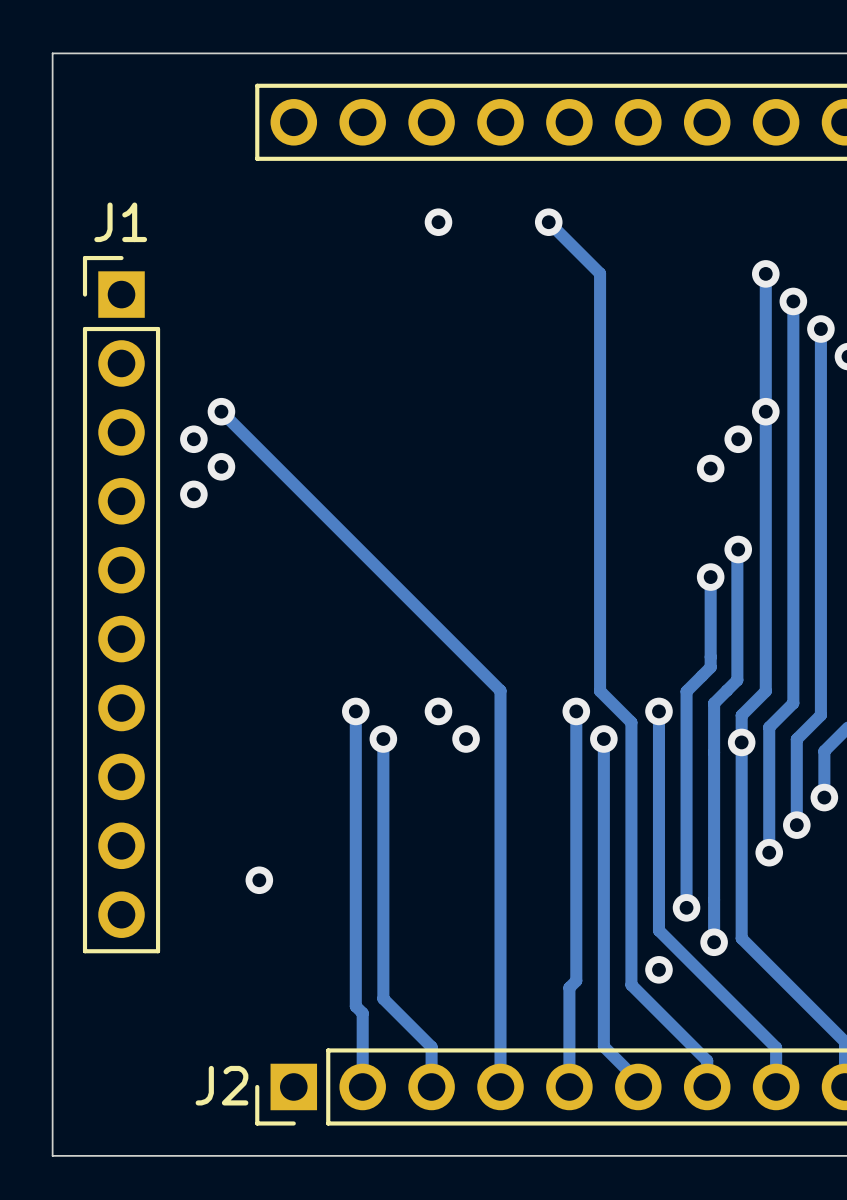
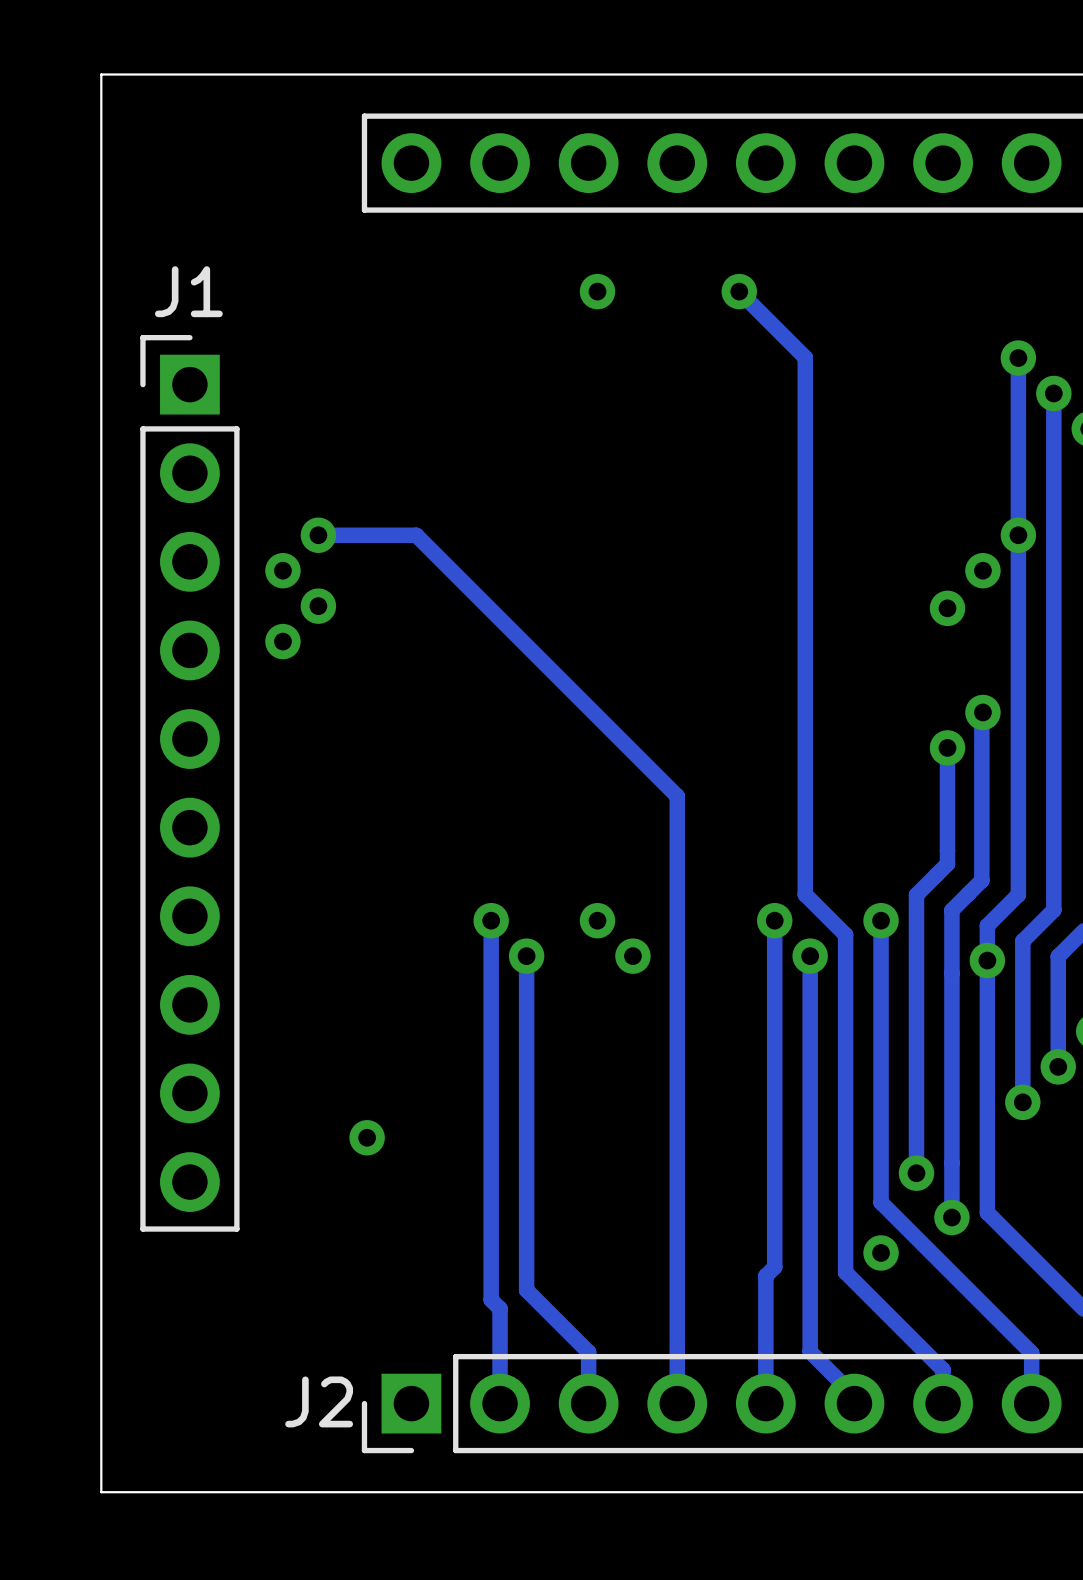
track: (221, 411) (500, 690) -> (318, 535) (416, 535) (677, 796) (677, 894)

